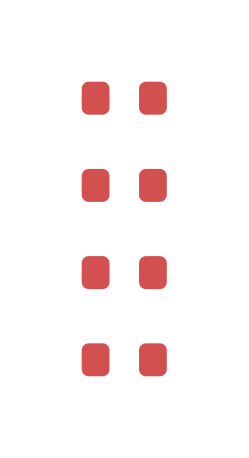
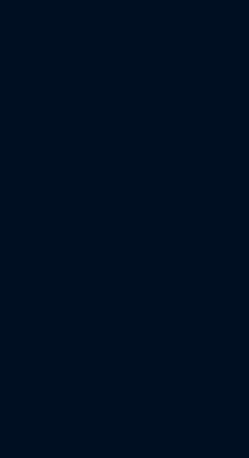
part: (124, 98) -> none
part: (124, 185) -> none
part: (124, 272) -> none
part: (124, 359) -> none

